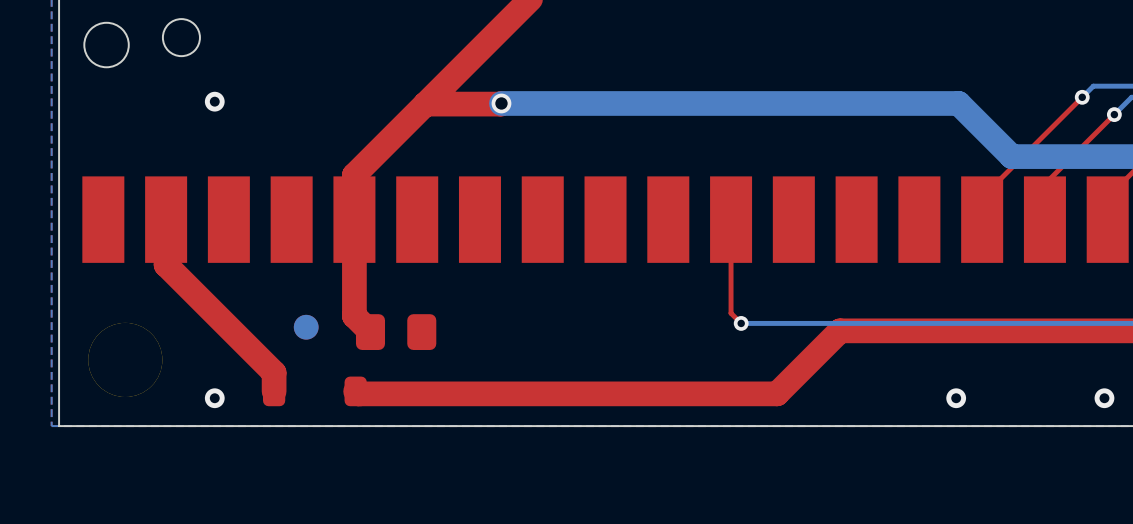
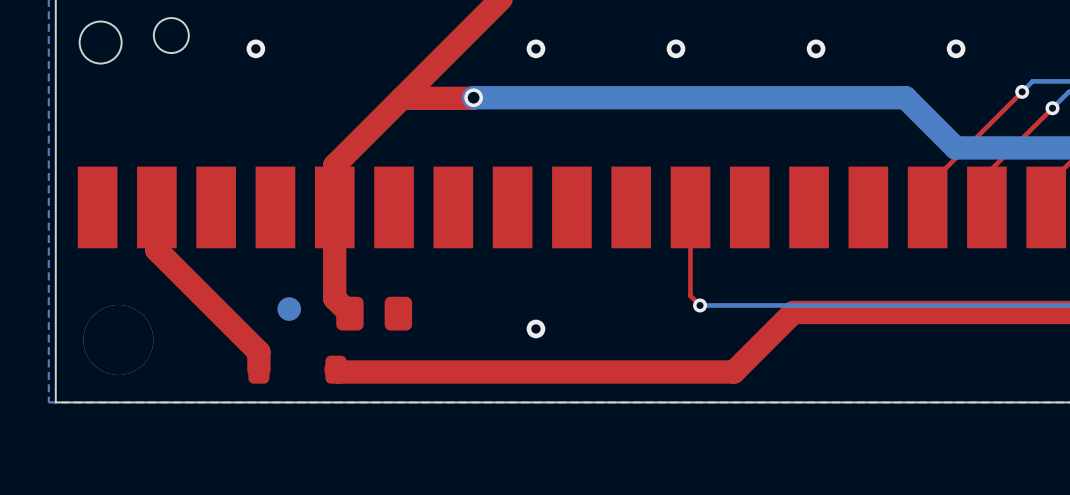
via: none -> (535, 48)
via: none -> (676, 48)
via: none -> (816, 48)
via: none -> (956, 48)
via position: (214, 101) -> (255, 48)
via: none -> (535, 328)
via: (214, 398) -> none
via: (956, 398) -> none
via: (1104, 398) -> none

